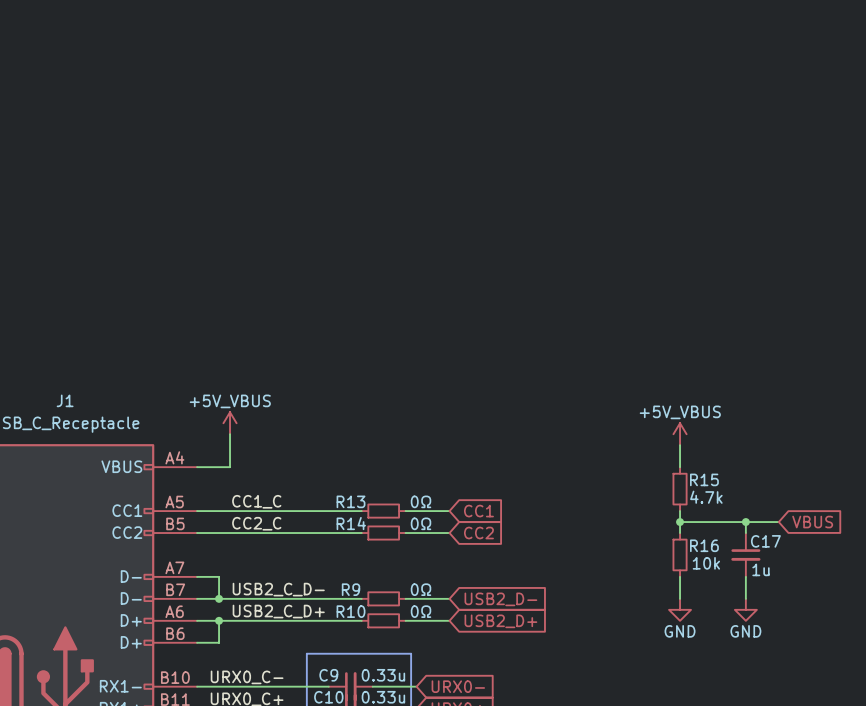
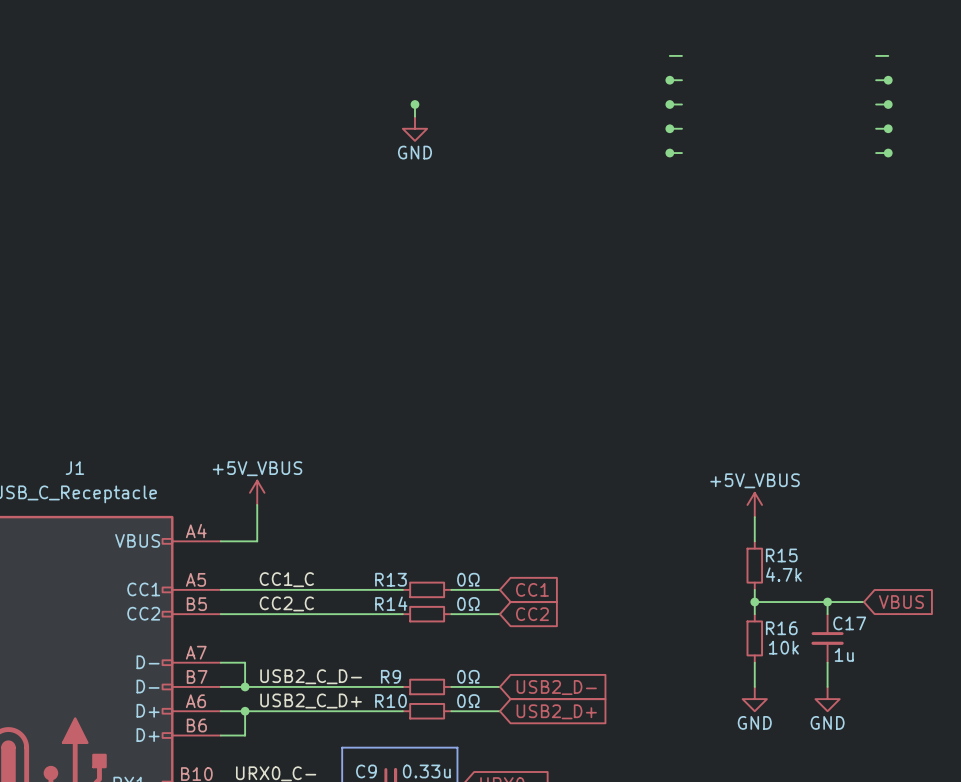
wire: none -> (669, 55) (681, 55)
wire: none -> (876, 55) (888, 55)
wire: none -> (669, 80) (681, 80)
junction: none -> (669, 80)
wire: none -> (876, 80) (888, 80)
junction: none -> (888, 80)
wire: none -> (414, 104) (414, 116)
junction: none -> (414, 104)
wire: none -> (669, 104) (681, 104)
junction: none -> (669, 104)
wire: none -> (876, 104) (888, 104)
junction: none -> (888, 104)
power symbol: none -> GND (414, 128)
wire: none -> (669, 128) (681, 128)
junction: none -> (669, 128)
wire: none -> (876, 128) (888, 128)
junction: none -> (888, 128)
wire: none -> (669, 153) (681, 153)
junction: none -> (669, 153)
wire: none -> (876, 153) (888, 153)
junction: none -> (888, 153)

